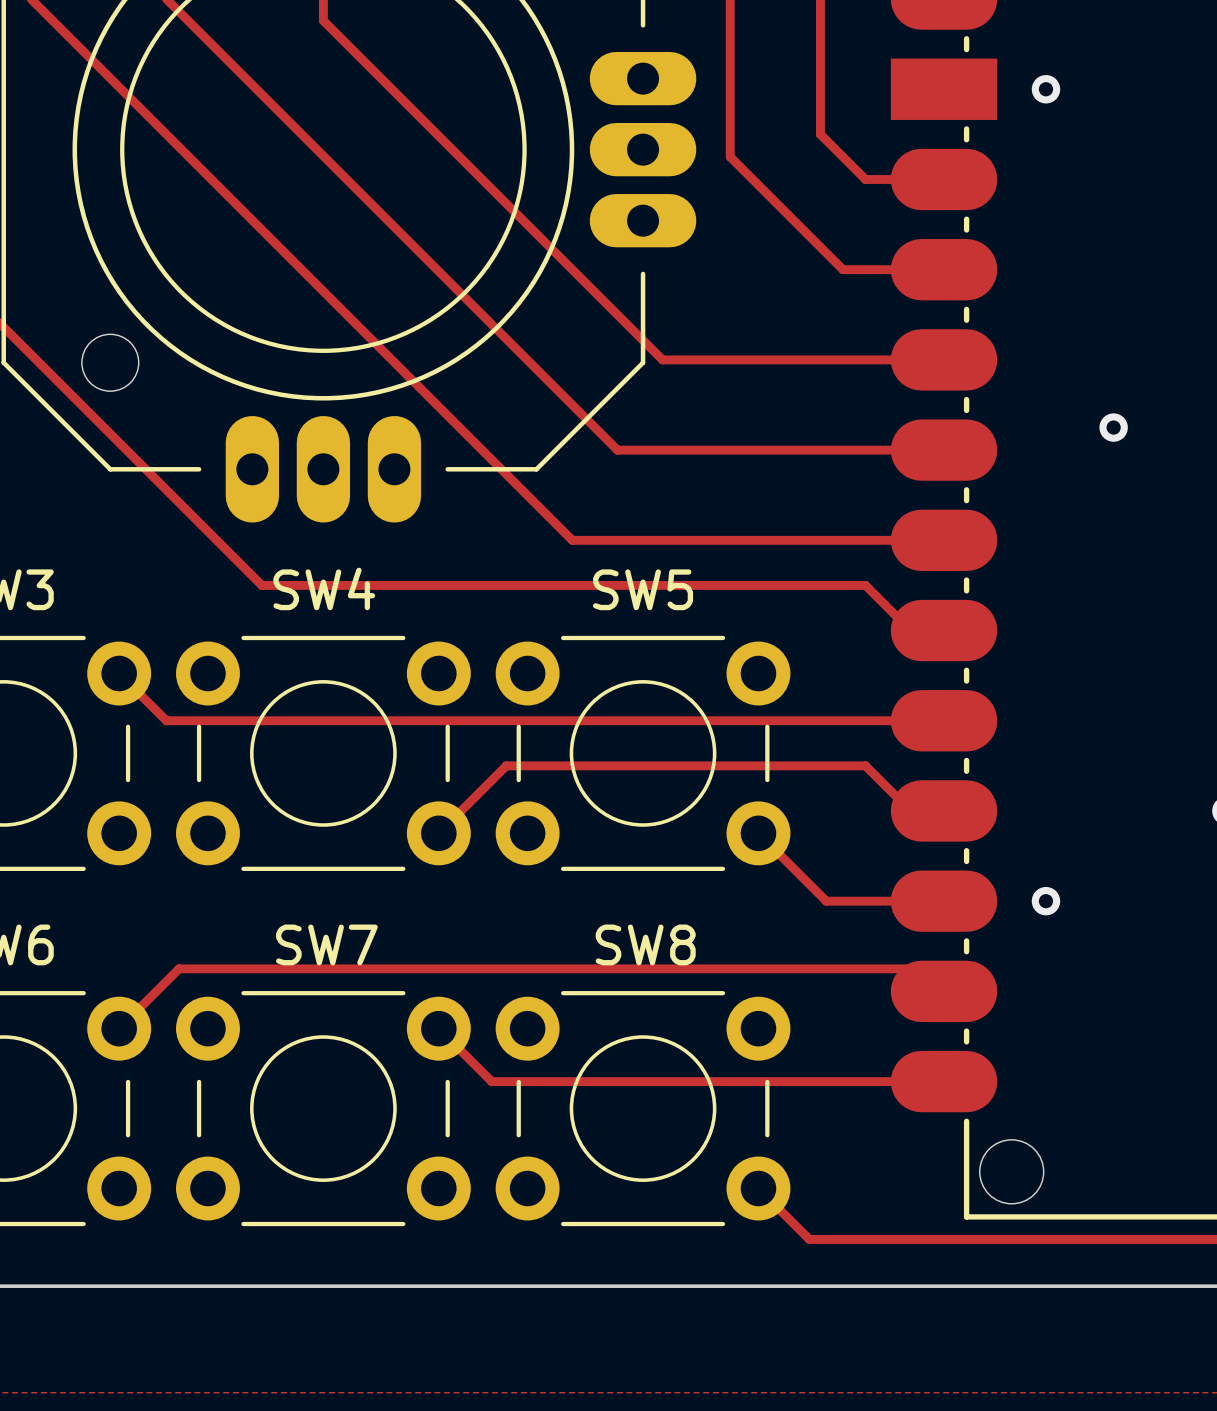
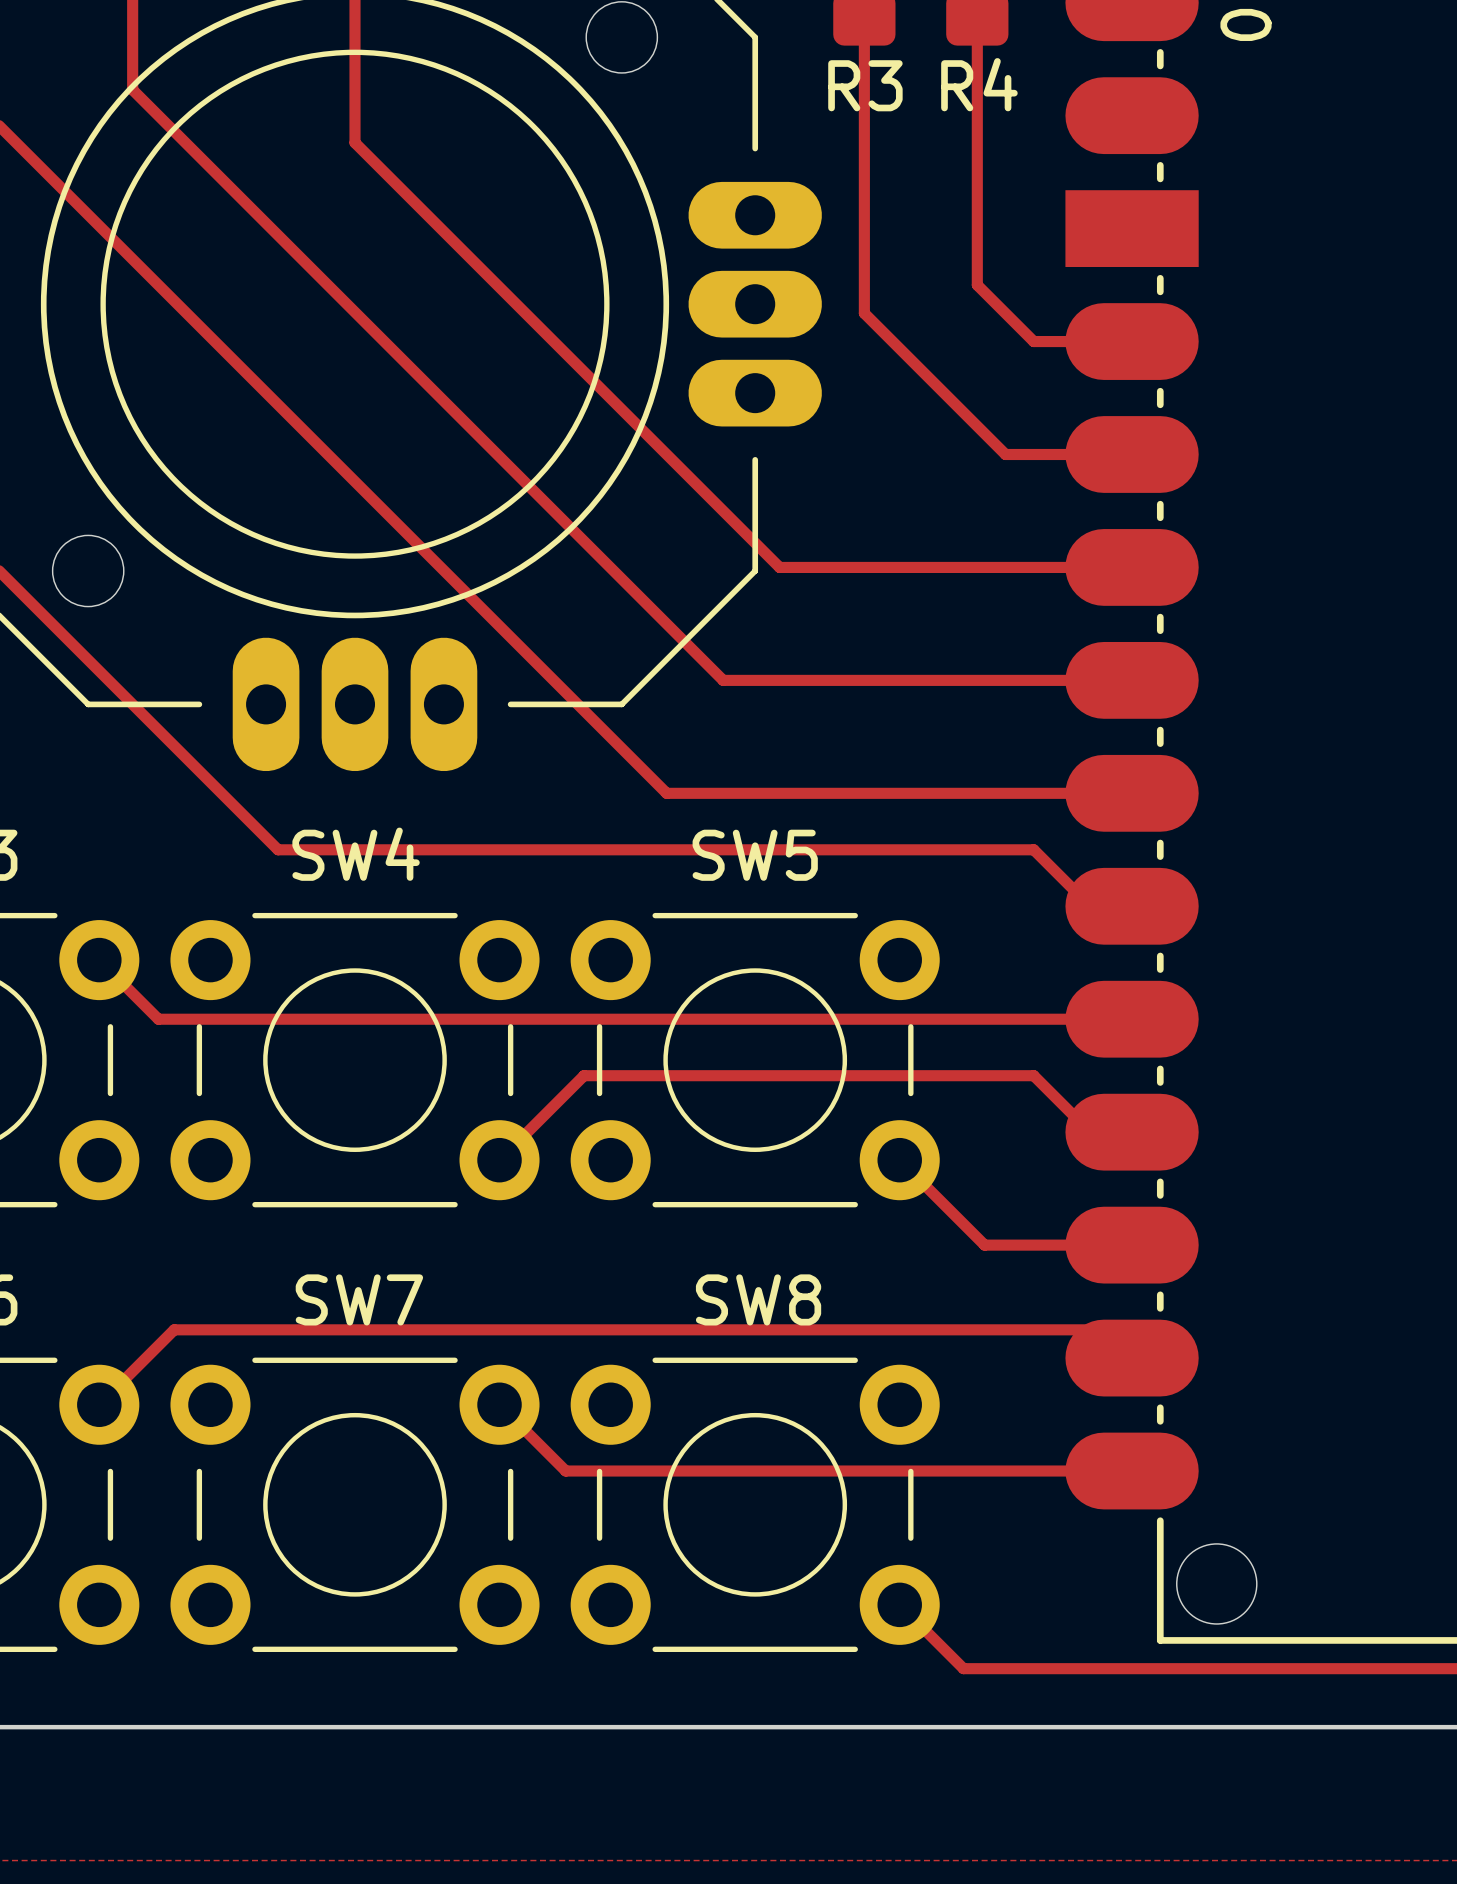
via: (1045, 89) -> none
via: (1113, 427) -> none
via: (1045, 901) -> none

